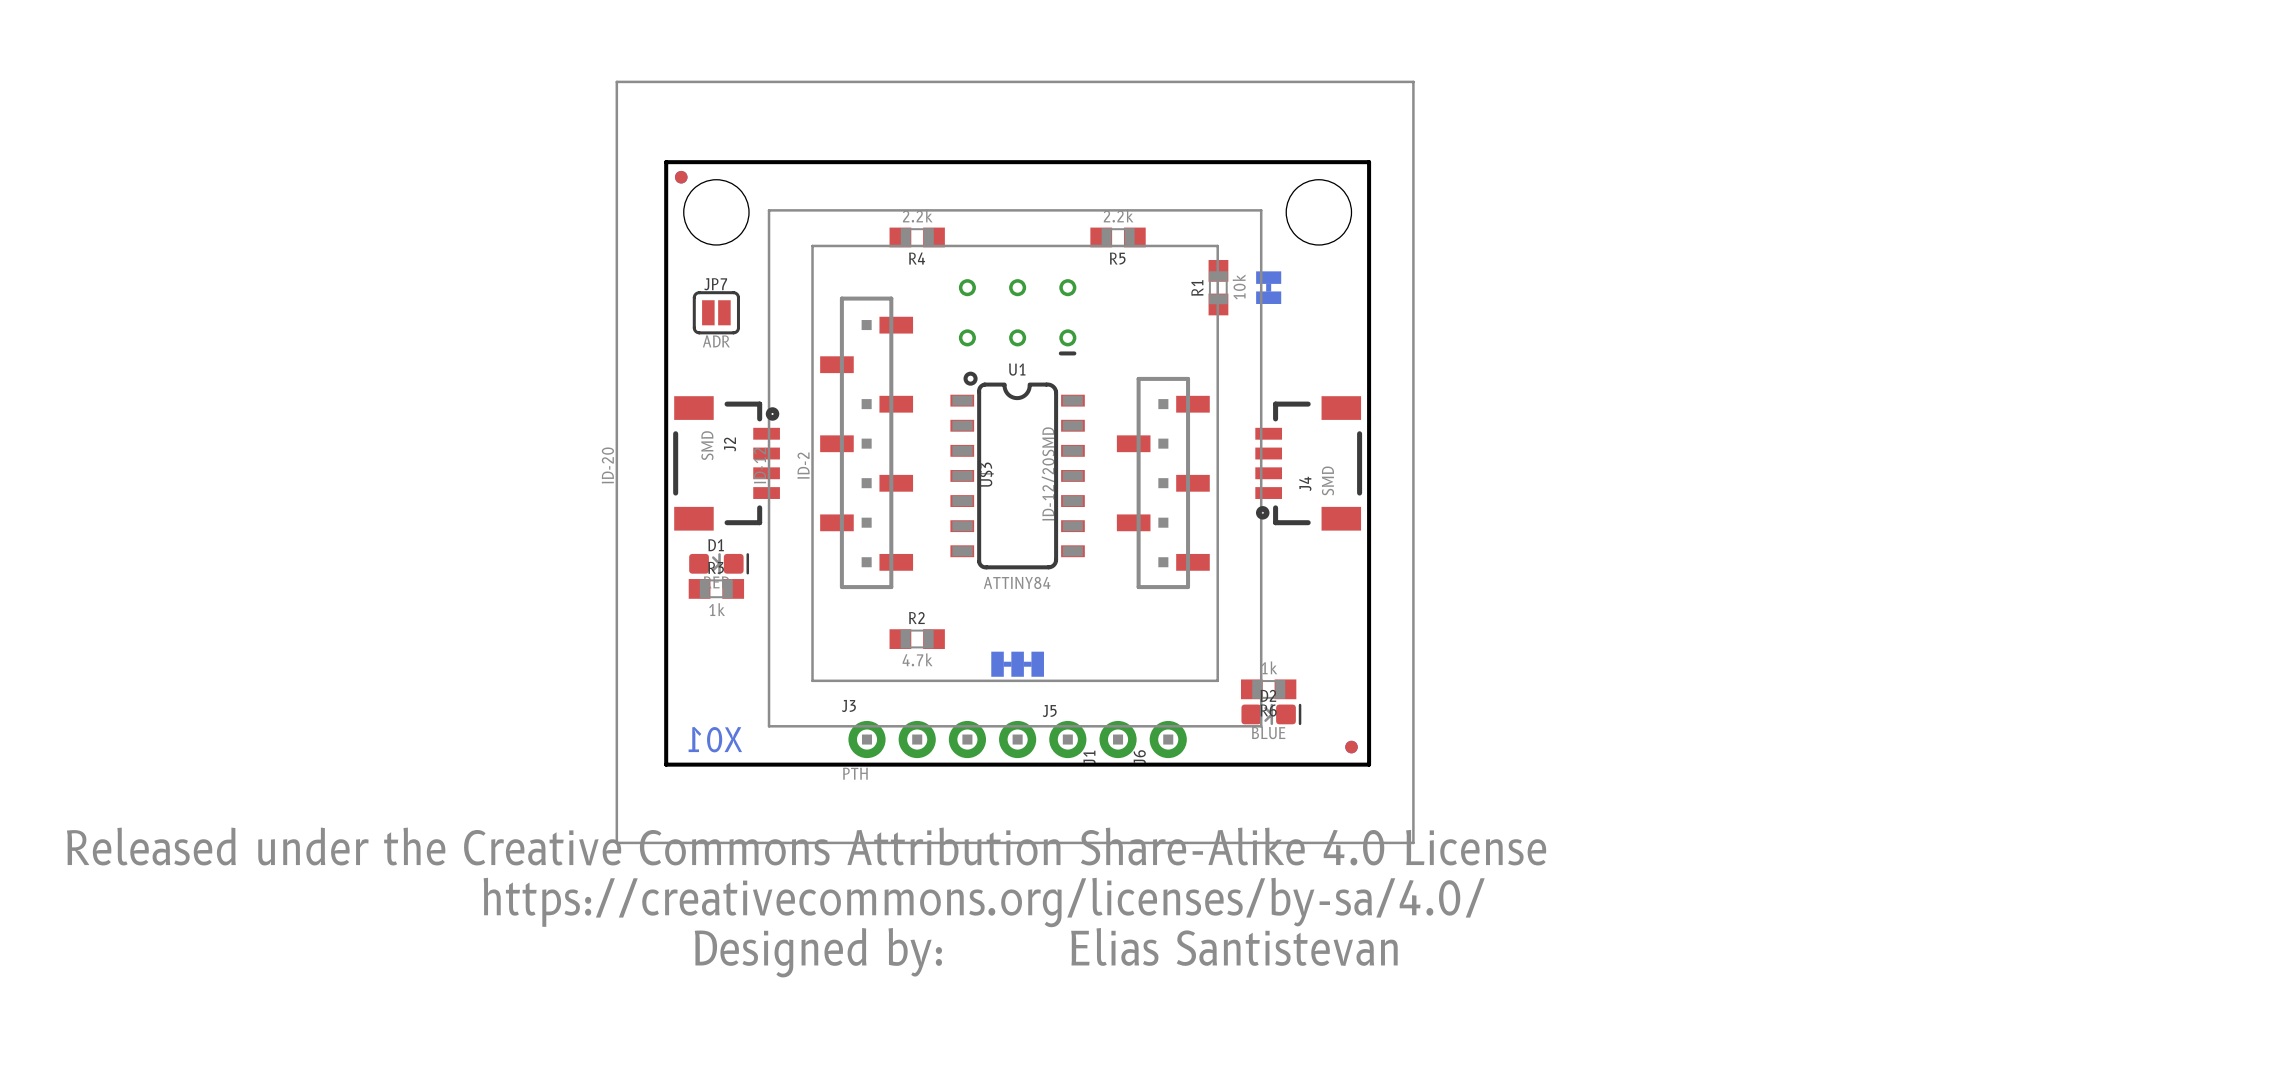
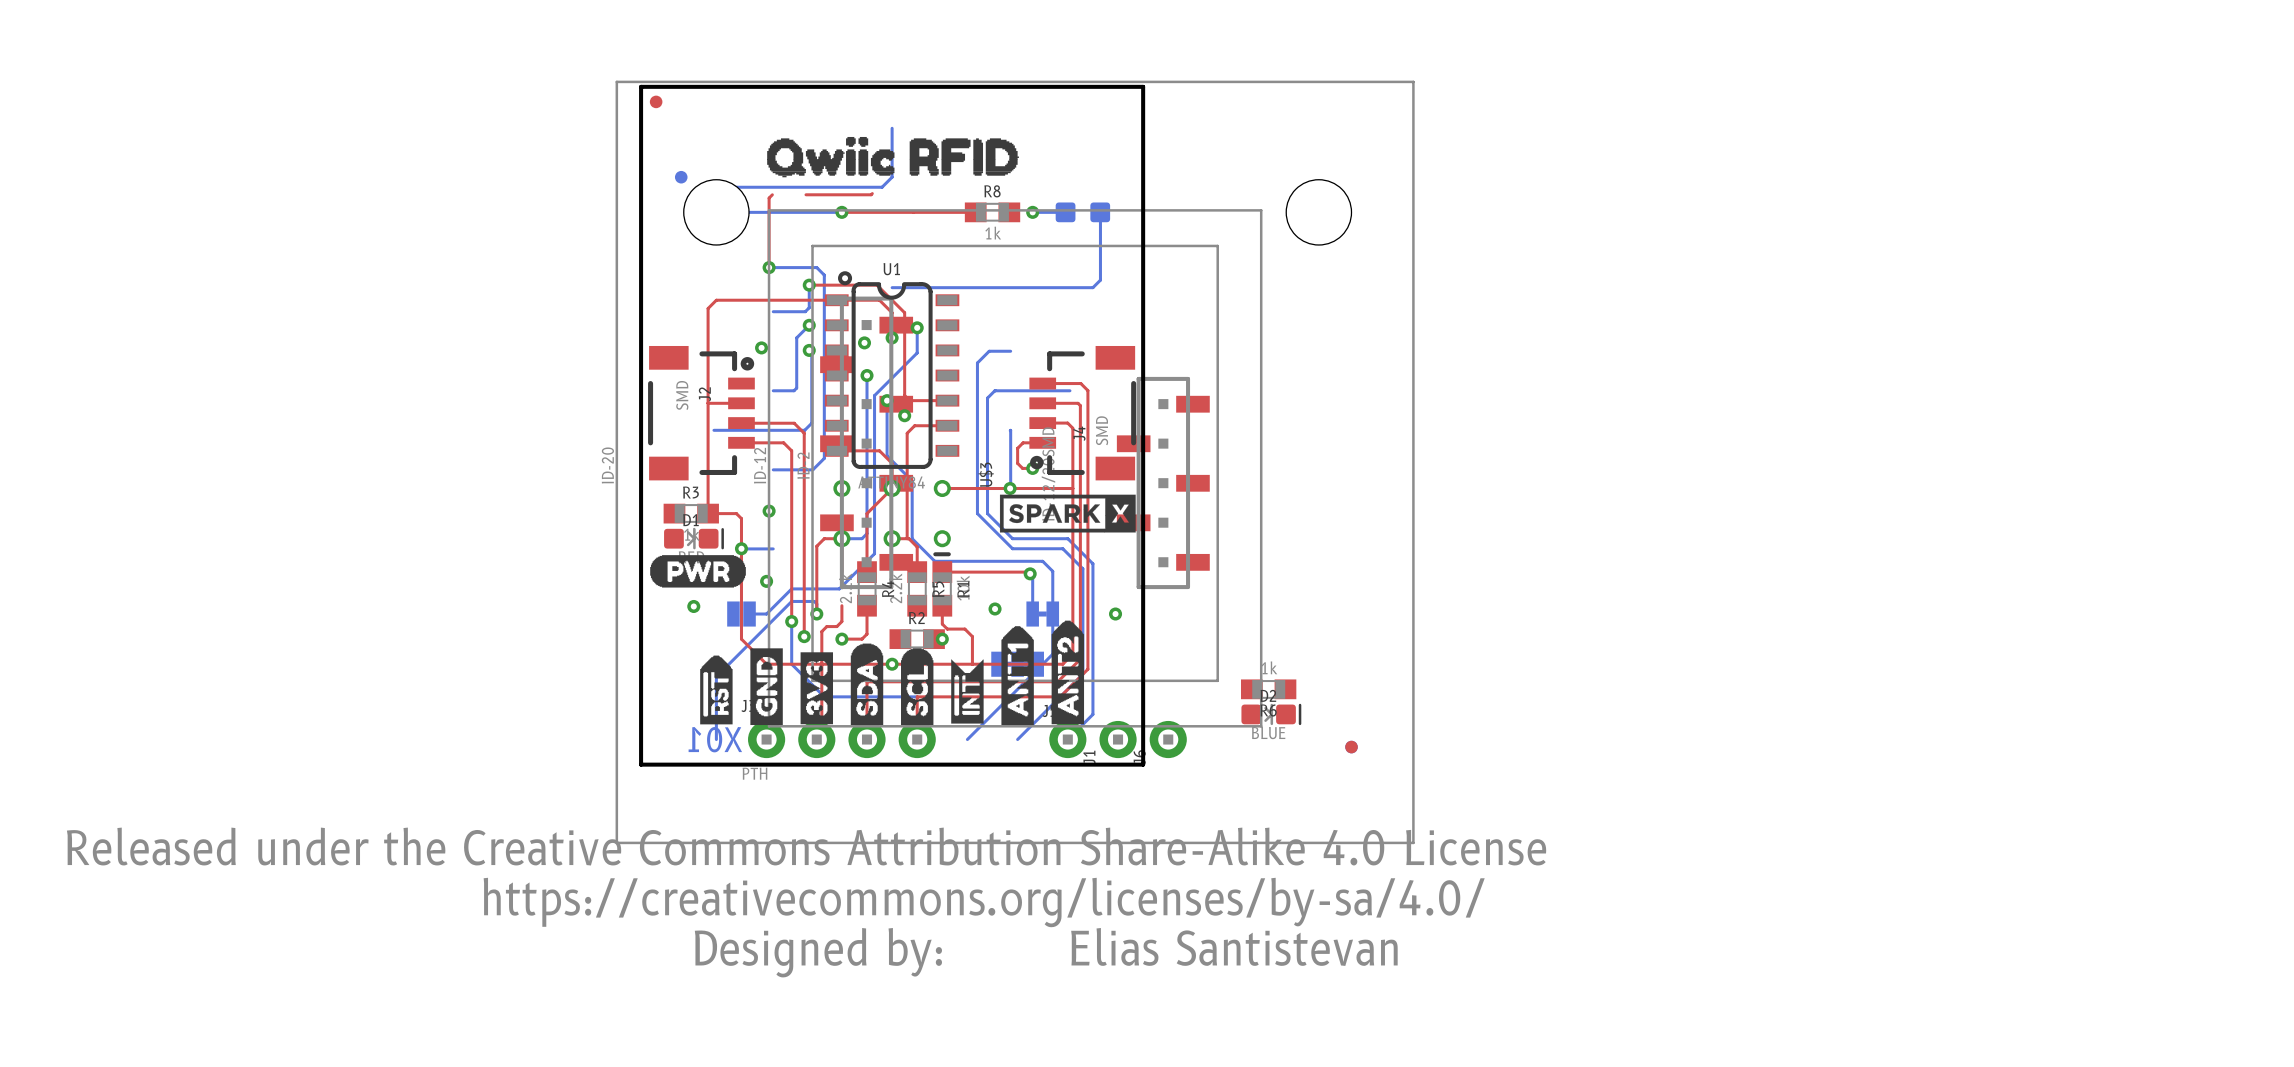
bottom track: none -> (892, 128) (892, 177) (882, 187) (698, 187) (688, 197) (688, 212)
drawing: none -> [767, 136, 1019, 178]
part position: (681, 177) -> (656, 101)
top track: none -> (872, 193) (805, 194)
top track: none -> (772, 194) (769, 198) (769, 267)
bottom track: none -> (708, 212) (841, 212)
top track: none -> (841, 212) (975, 212)
via: none -> (841, 212)
R8: none -> 1k (992, 212)
bottom track: none -> (1032, 212) (1065, 212)
via: none -> (1032, 212)
part: none -> (1082, 212)
bottom track: none -> (1100, 212) (1100, 280) (1092, 287) (892, 287)
R4 rotation: 0° (917, 237) -> 90° clockwise (867, 588)
R4 position: (917, 237) -> (867, 588)
R5 rotation: 0° (1118, 237) -> 90° clockwise (917, 588)
R5 position: (1118, 237) -> (917, 588)
bottom track: none -> (769, 267) (816, 267) (824, 275) (824, 458) (812, 469) (773, 469)
via: none -> (769, 267)
top track: none -> (809, 285) (877, 285) (904, 312) (904, 395) (909, 400) (947, 400)
bottom track: none -> (809, 285) (809, 307) (805, 311) (773, 311)
via: none -> (809, 285)
R1 position: (1218, 287) -> (942, 588)
part rotation: 0° (1268, 287) -> 90° clockwise (1042, 614)
part position: (1268, 287) -> (1042, 614)
R1 name position: R1 (1197, 288) -> R1 (963, 589)
JP7 side: top (716, 312) -> bottom (741, 614)
part position: (1017, 317) -> (892, 518)
bottom track: none -> (809, 325) (796, 337) (796, 388) (794, 390) (773, 390)
via: none -> (809, 325)
bottom track: none -> (917, 327) (917, 352) (874, 395) (874, 553) (839, 588) (791, 588) (766, 614) (749, 614)
via: none -> (917, 327)
top track: none -> (892, 337) (892, 312) (879, 300) (716, 300) (708, 308) (708, 513) (736, 513) (741, 518) (741, 639) (766, 664) (1062, 664) (1072, 654) (1072, 428) (1067, 423) (1042, 423)
via: none -> (892, 337)
via: none -> (864, 342)
via: none -> (761, 347)
bottom track: none -> (809, 350) (811, 352) (811, 423) (804, 430) (713, 430)
via: none -> (809, 350)
bottom track: none -> (1010, 351) (989, 351) (977, 362) (977, 513) (1012, 548) (1062, 548) (1082, 568) (1082, 674) (1017, 739)
bottom track: none -> (867, 375) (867, 533) (861, 538) (841, 538)
via: none -> (867, 375)
top track: none -> (1042, 383) (1080, 383) (1087, 390) (1087, 669) (1060, 696) (917, 696) (917, 739)
bottom track: none -> (995, 390) (987, 398) (987, 513) (1012, 538) (1067, 538) (1092, 563) (1092, 714) (1067, 739)
bottom track: none -> (995, 390) (1069, 390)
bottom track: none -> (887, 400) (887, 455) (912, 480) (912, 538) (934, 561) (1042, 561) (1052, 571) (1052, 654) (967, 739)
via: none -> (887, 400)
top track: none -> (708, 403) (741, 403)
top track: none -> (1042, 403) (1078, 403) (1080, 405) (1080, 659) (1057, 681) (867, 681) (867, 739)
via: none -> (904, 415)
top track: none -> (741, 423) (794, 423) (804, 433) (804, 636)
top track: none -> (947, 425) (914, 425) (907, 433) (907, 538)
bottom track: none -> (1010, 430) (1010, 488)
top track: none -> (741, 442) (783, 442) (791, 450) (791, 621)
top track: none -> (1042, 442) (1023, 442) (1017, 448) (1017, 463) (1022, 468) (1032, 468)
top track: none -> (836, 450) (879, 450) (892, 463) (892, 488) (867, 513) (867, 572)
J2 position: (726, 463) -> (701, 413)
J4 position: (1308, 463) -> (1082, 413)
via: none -> (1032, 468)
U1 position: (1017, 470) -> (892, 370)
top track: none -> (942, 488) (1072, 488)
via: none -> (1010, 488)
drawing: none -> [999, 494, 1136, 533]
via: none -> (769, 511)
top track: none -> (892, 538) (908, 538) (917, 547) (917, 572)
bottom track: none -> (741, 548) (773, 548)
via: none -> (741, 548)
drawing: none -> [650, 555, 746, 588]
D1 position: (719, 563) -> (693, 538)
top track: none -> (841, 572) (841, 538) (824, 538) (816, 546) (816, 614)
top track: none -> (942, 572) (1028, 572) (1030, 573)
bottom track: none -> (1030, 573) (1032, 576) (1032, 614)
via: none -> (1030, 573)
via: none -> (766, 581)
R3 position: (716, 588) -> (691, 513)
top track: none -> (841, 605) (841, 621) (836, 626) (826, 626) (821, 631) (821, 734) (816, 739)
top track: none -> (867, 605) (867, 634) (861, 639) (841, 639)
top track: none -> (942, 605) (942, 624) (947, 629) (964, 629) (972, 636) (972, 664)
via: none -> (693, 606)
via: none -> (995, 608)
bottom track: none -> (816, 614) (816, 603) (814, 601) (791, 601) (716, 676) (716, 739)
via: none -> (816, 614)
via: none -> (1115, 614)
drawing: none -> [700, 620, 1085, 726]
bottom track: none -> (791, 621) (791, 664) (824, 696) (917, 696)
via: none -> (791, 621)
via: none -> (804, 636)
via: none -> (841, 639)
via: none -> (942, 639)
via: none -> (892, 664)
J3 position: (942, 739) -> (841, 739)
board edge: (666, 764) (666, 162) (1369, 162) (1369, 764) (1143, 764) -> (666, 764) (641, 764) (641, 86) (1143, 86) (1143, 764)

